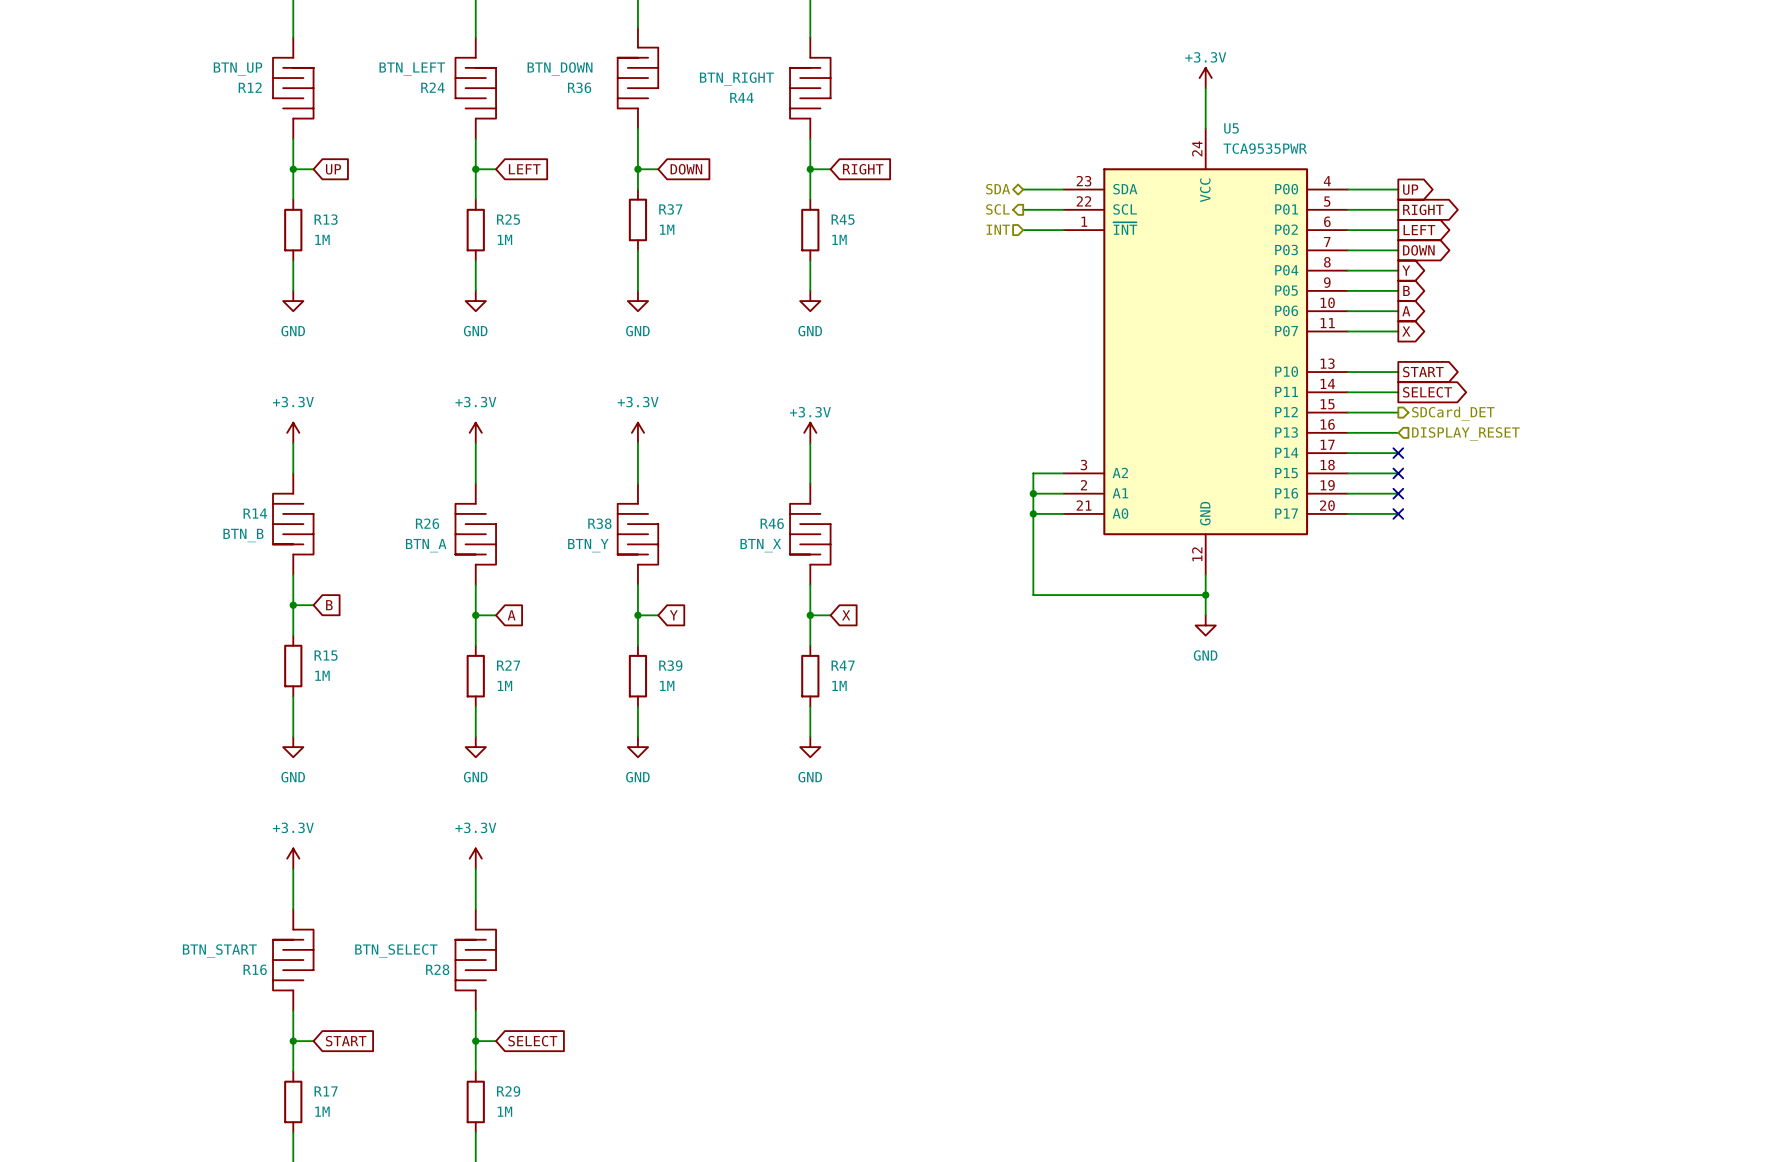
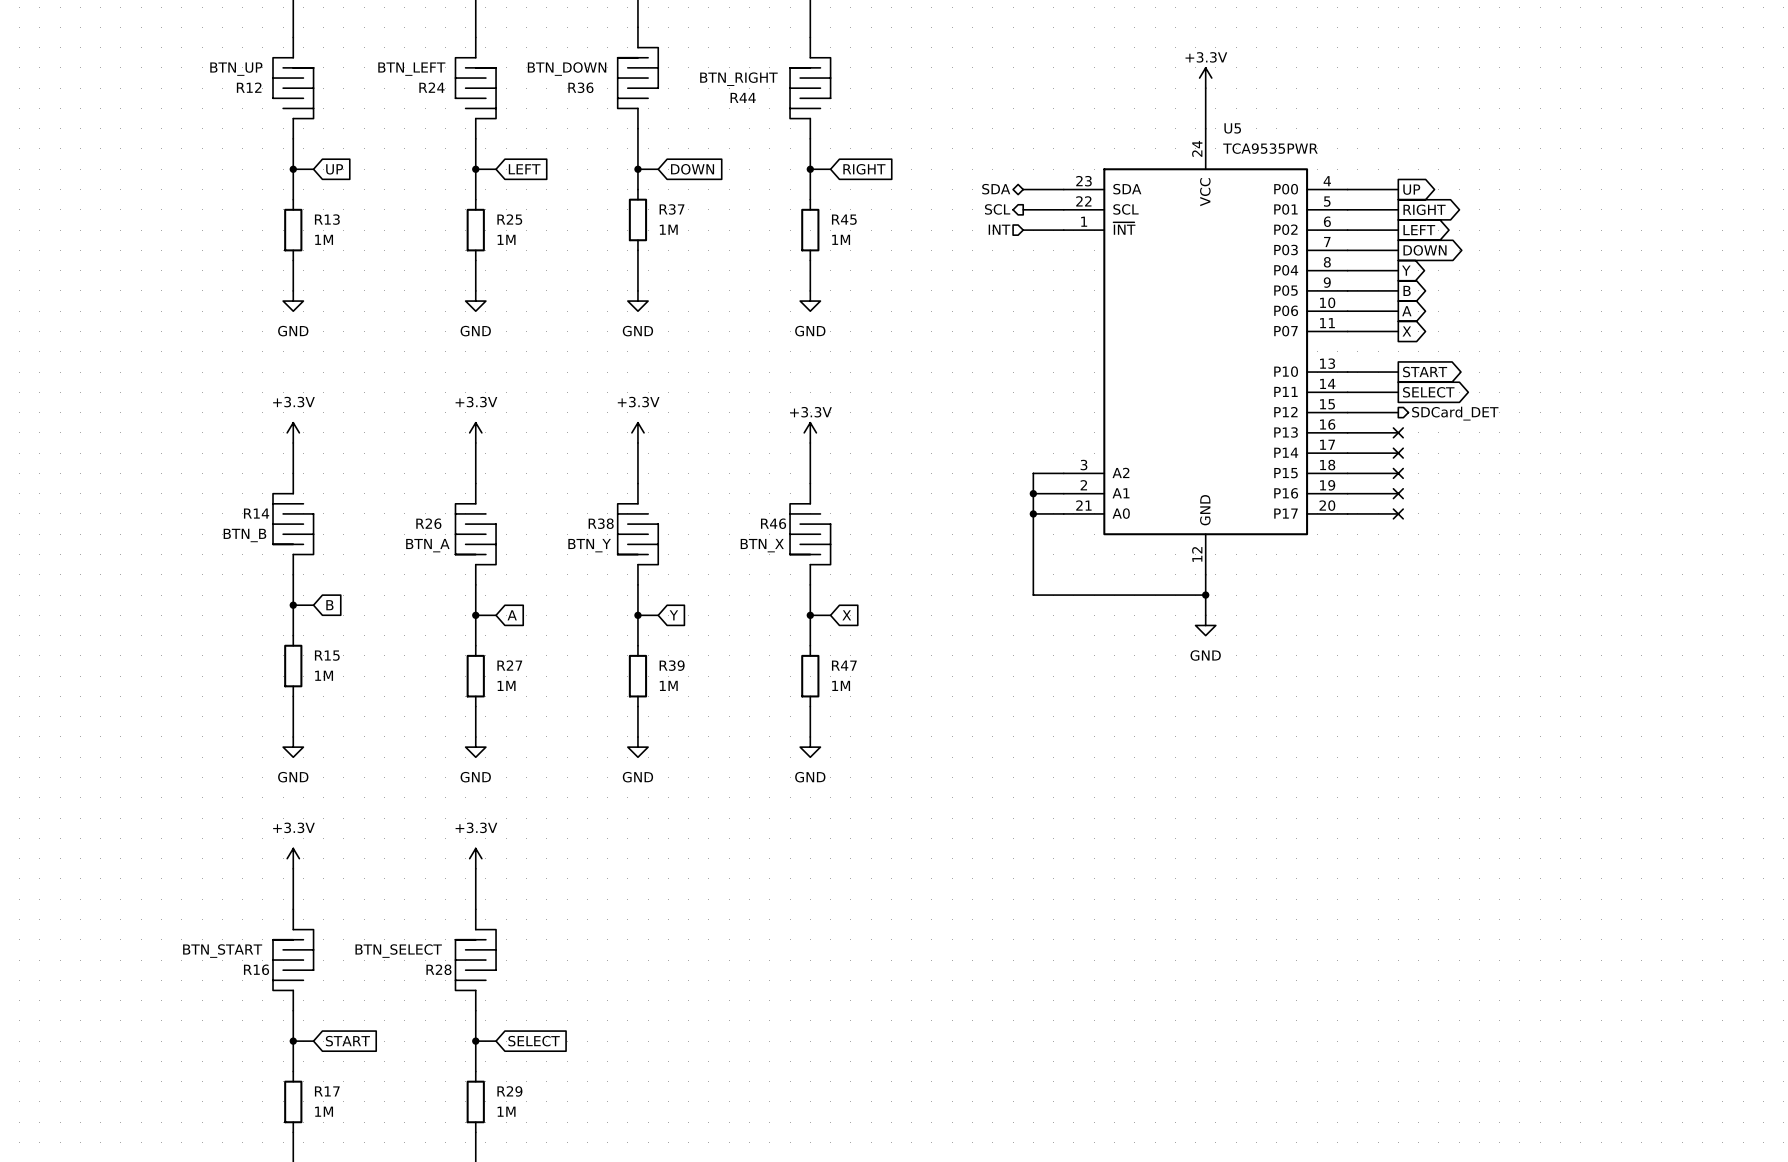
no-connect mark: none -> (1398, 432)
hierarchical label: DISPLAY_RESET (1465, 434) -> none

